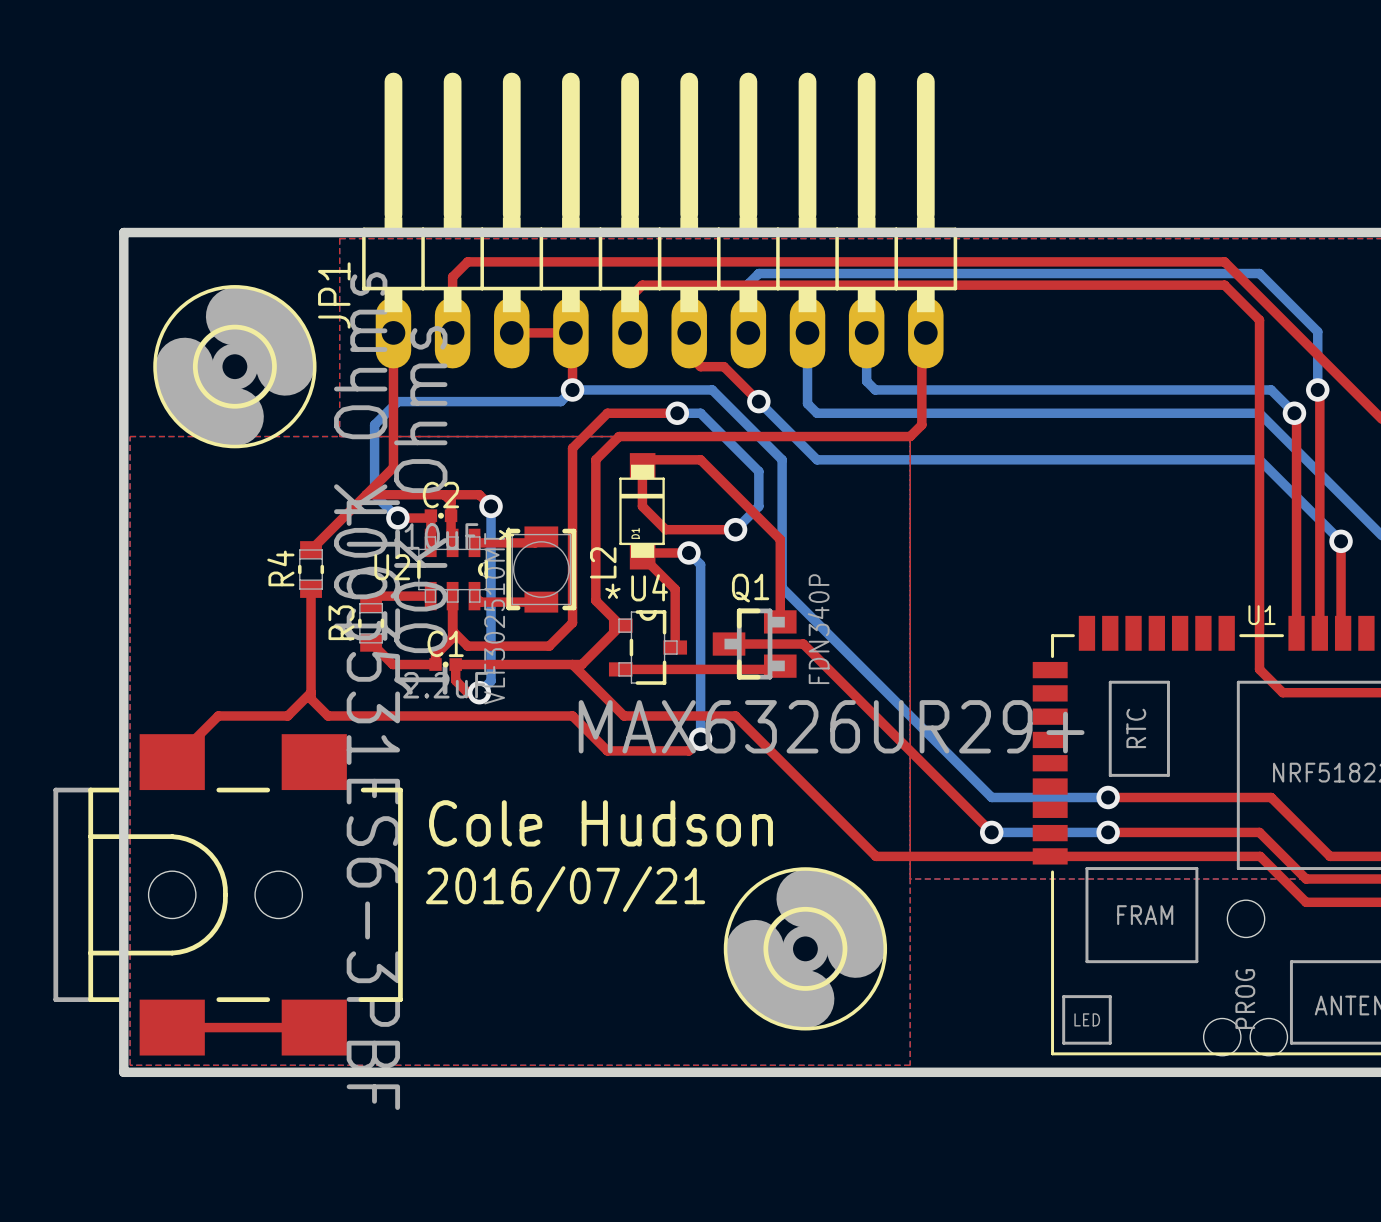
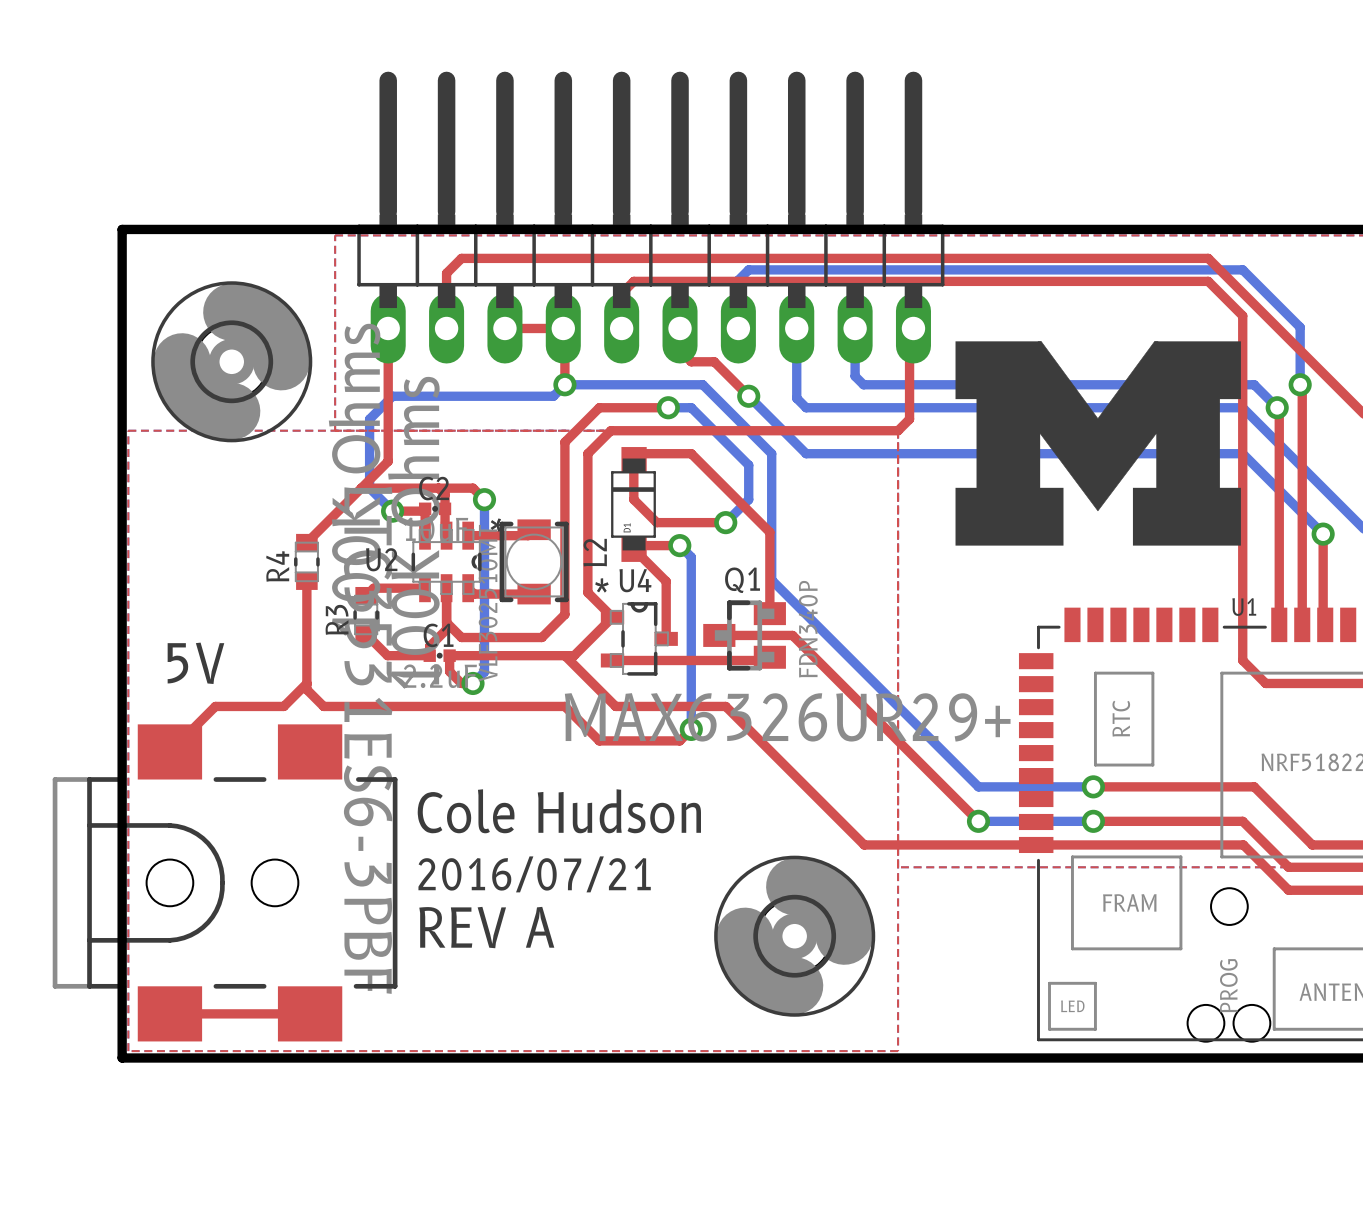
JP1 name: JP1 (334, 295) -> none
drawing: none -> [955, 341, 1241, 546]
text: none -> 5V (195, 663)
text: none -> REV A (486, 927)

